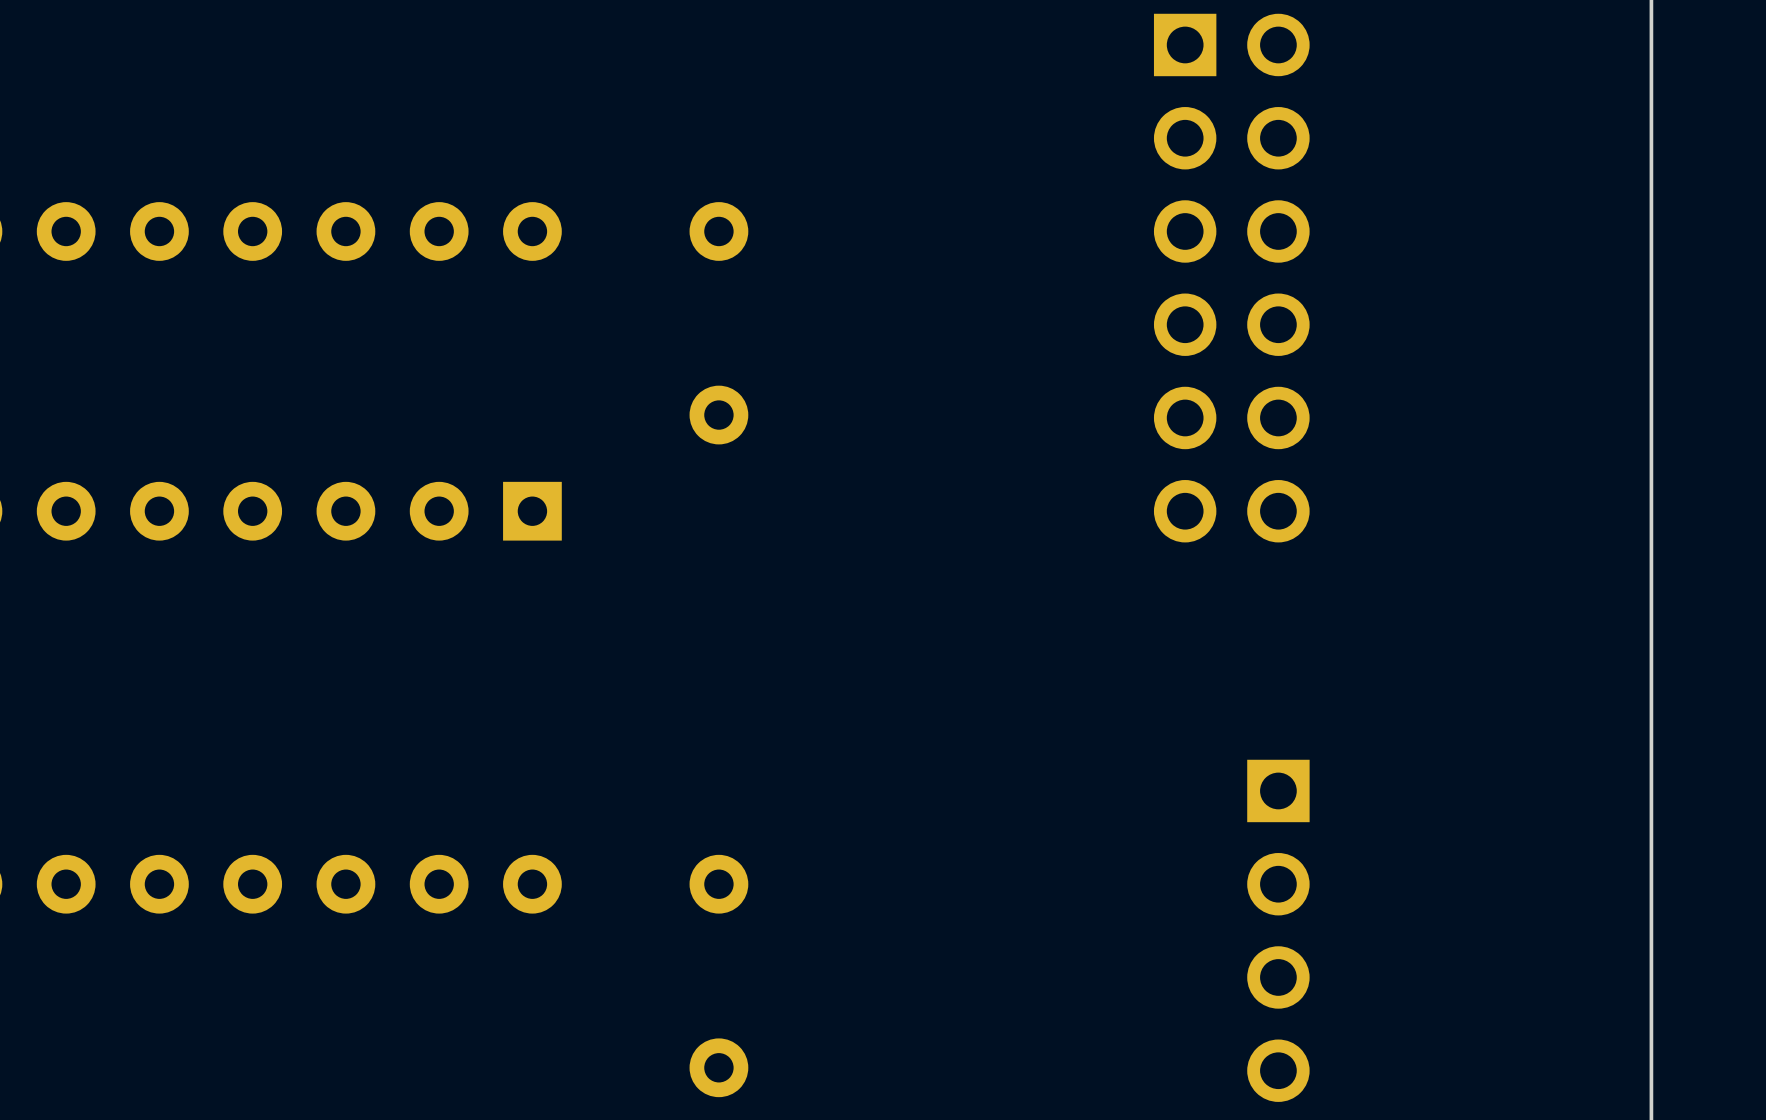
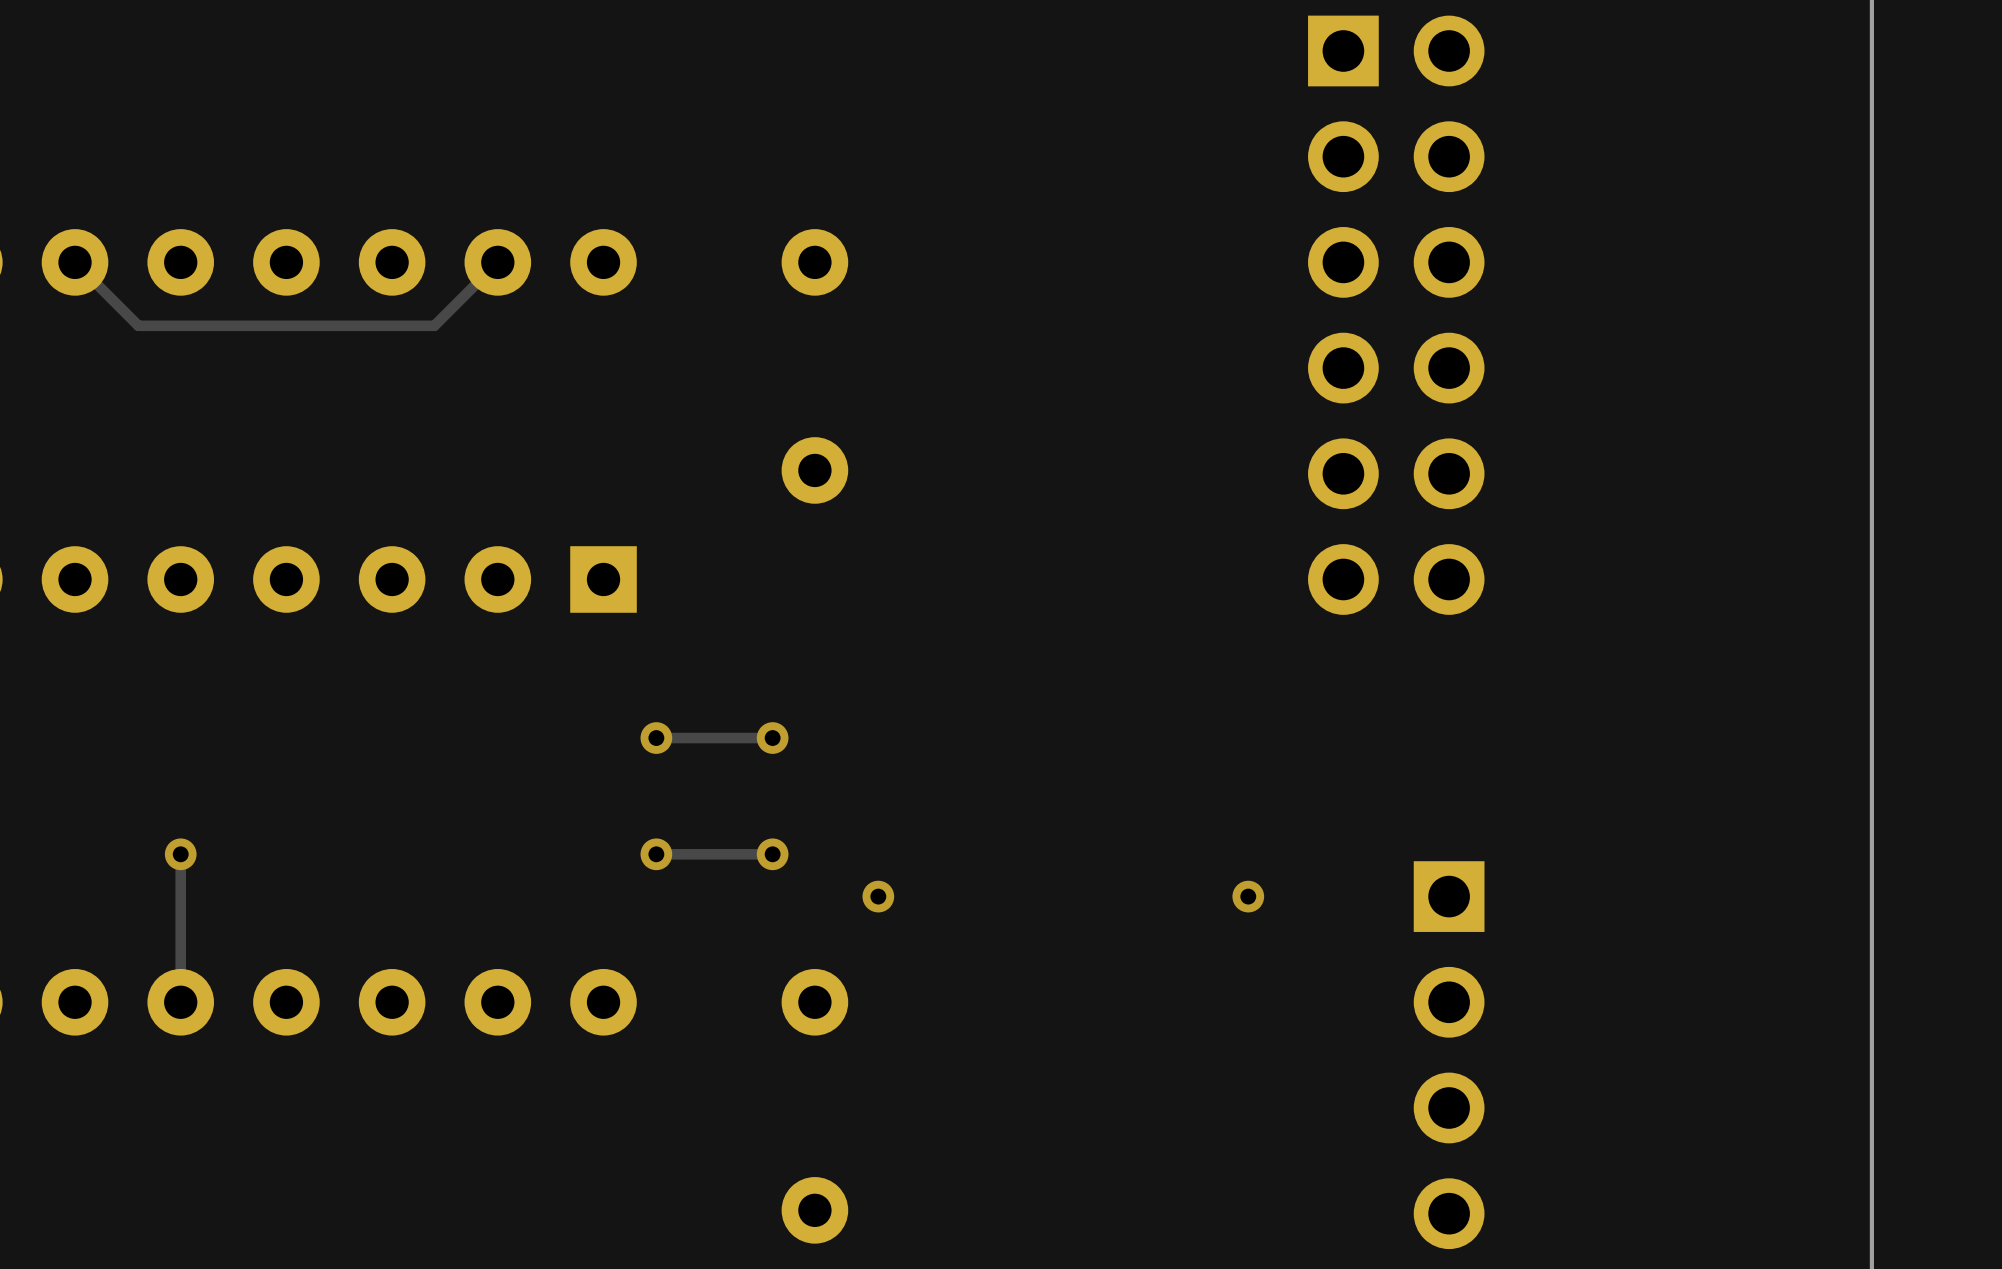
track: none -> (497, 262) (434, 325) (138, 325) (75, 262)
via: none -> (656, 738)
track: none -> (772, 738) (656, 738)
via: none -> (772, 738)
track: none -> (180, 854) (180, 1002)
via: none -> (180, 854)
via: none -> (656, 854)
track: none -> (772, 854) (656, 854)
via: none -> (772, 854)
via: none -> (878, 896)
via: none -> (1248, 896)

